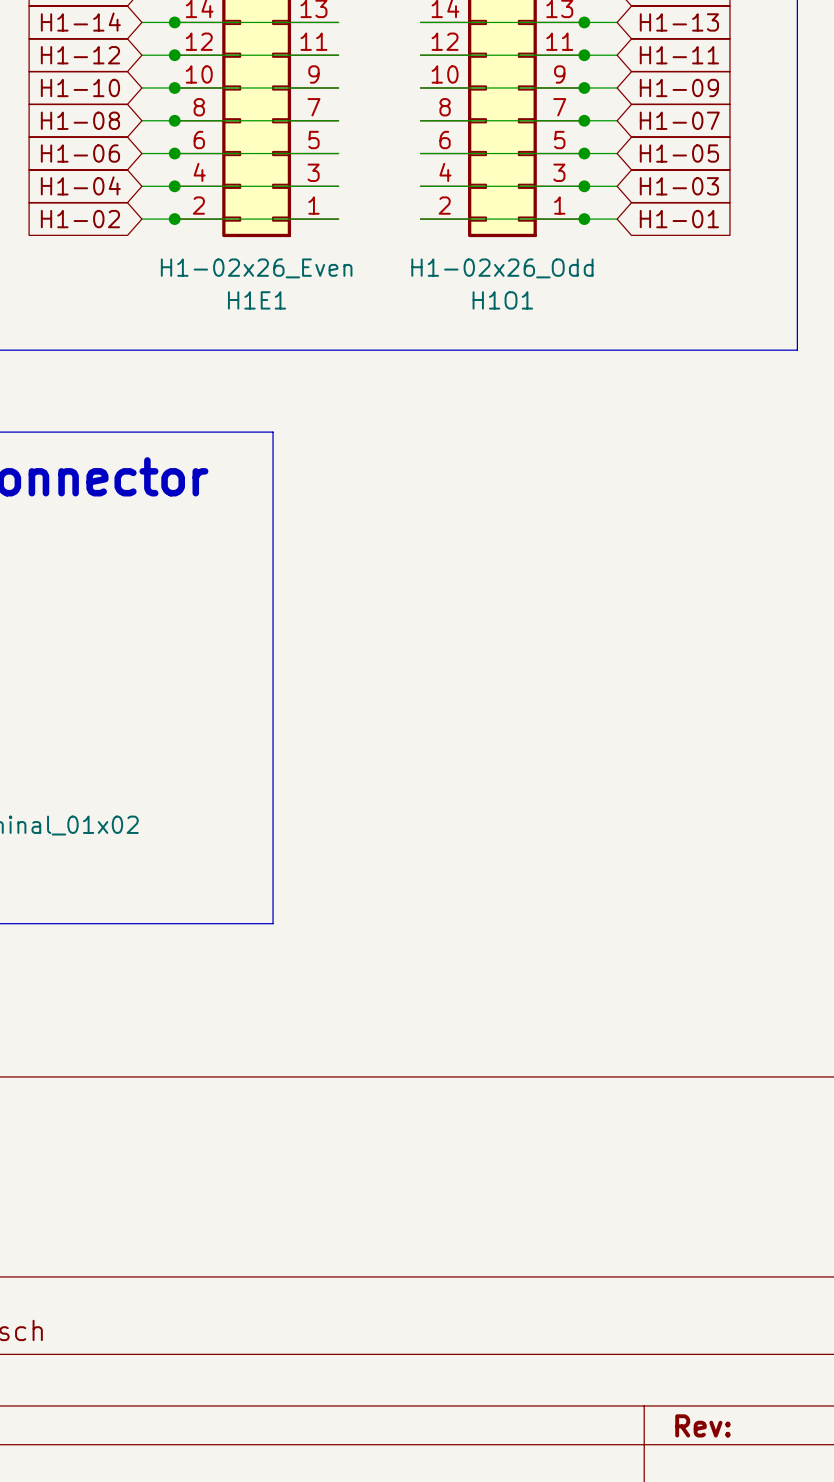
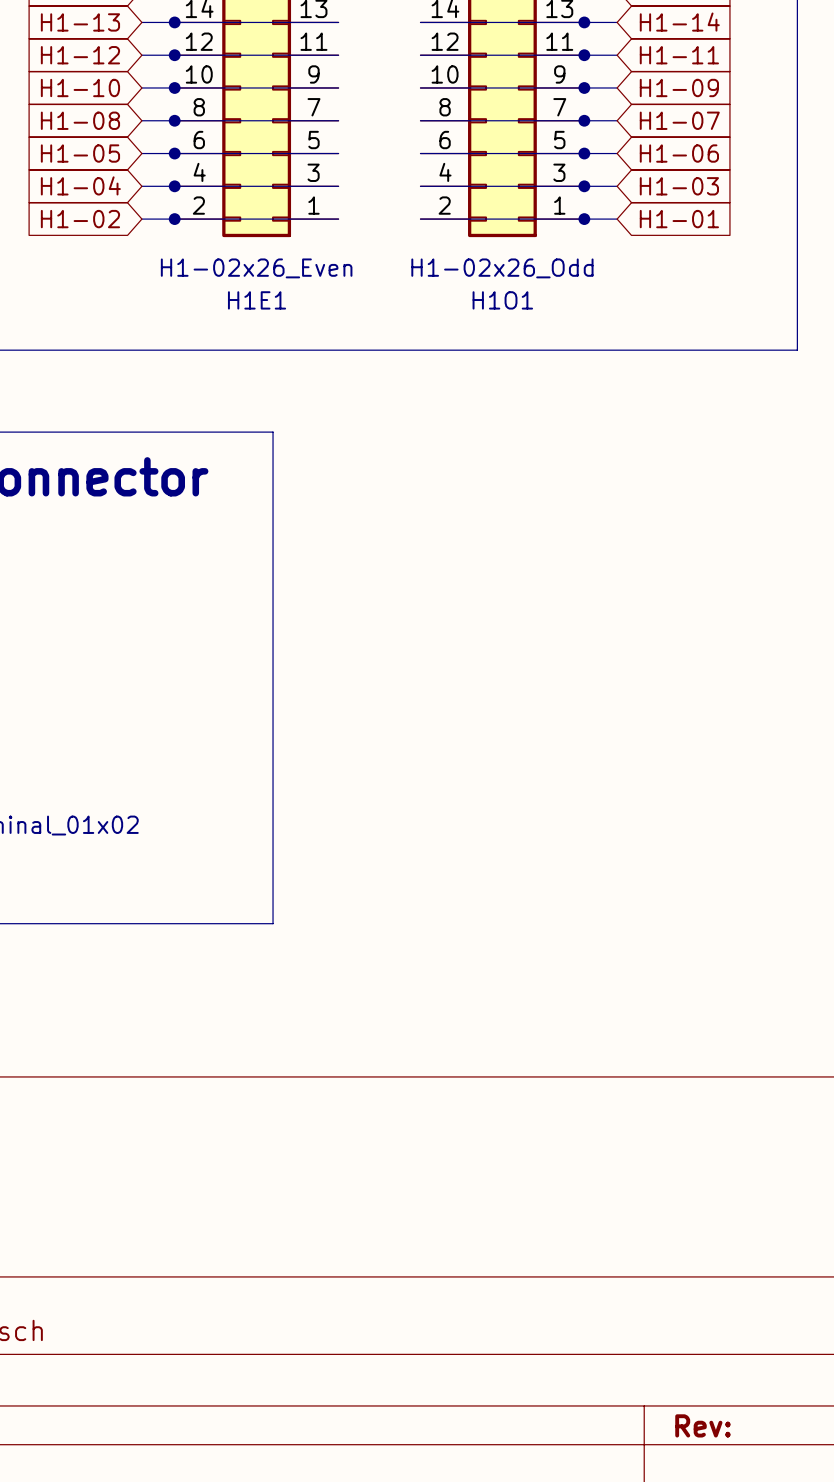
global label: H1-14 (80, 22) -> H1-13 (80, 22)
global label: H1-13 (679, 22) -> H1-14 (679, 22)
global label: H1-06 (80, 153) -> H1-05 (80, 153)
global label: H1-05 (679, 153) -> H1-06 (679, 153)

